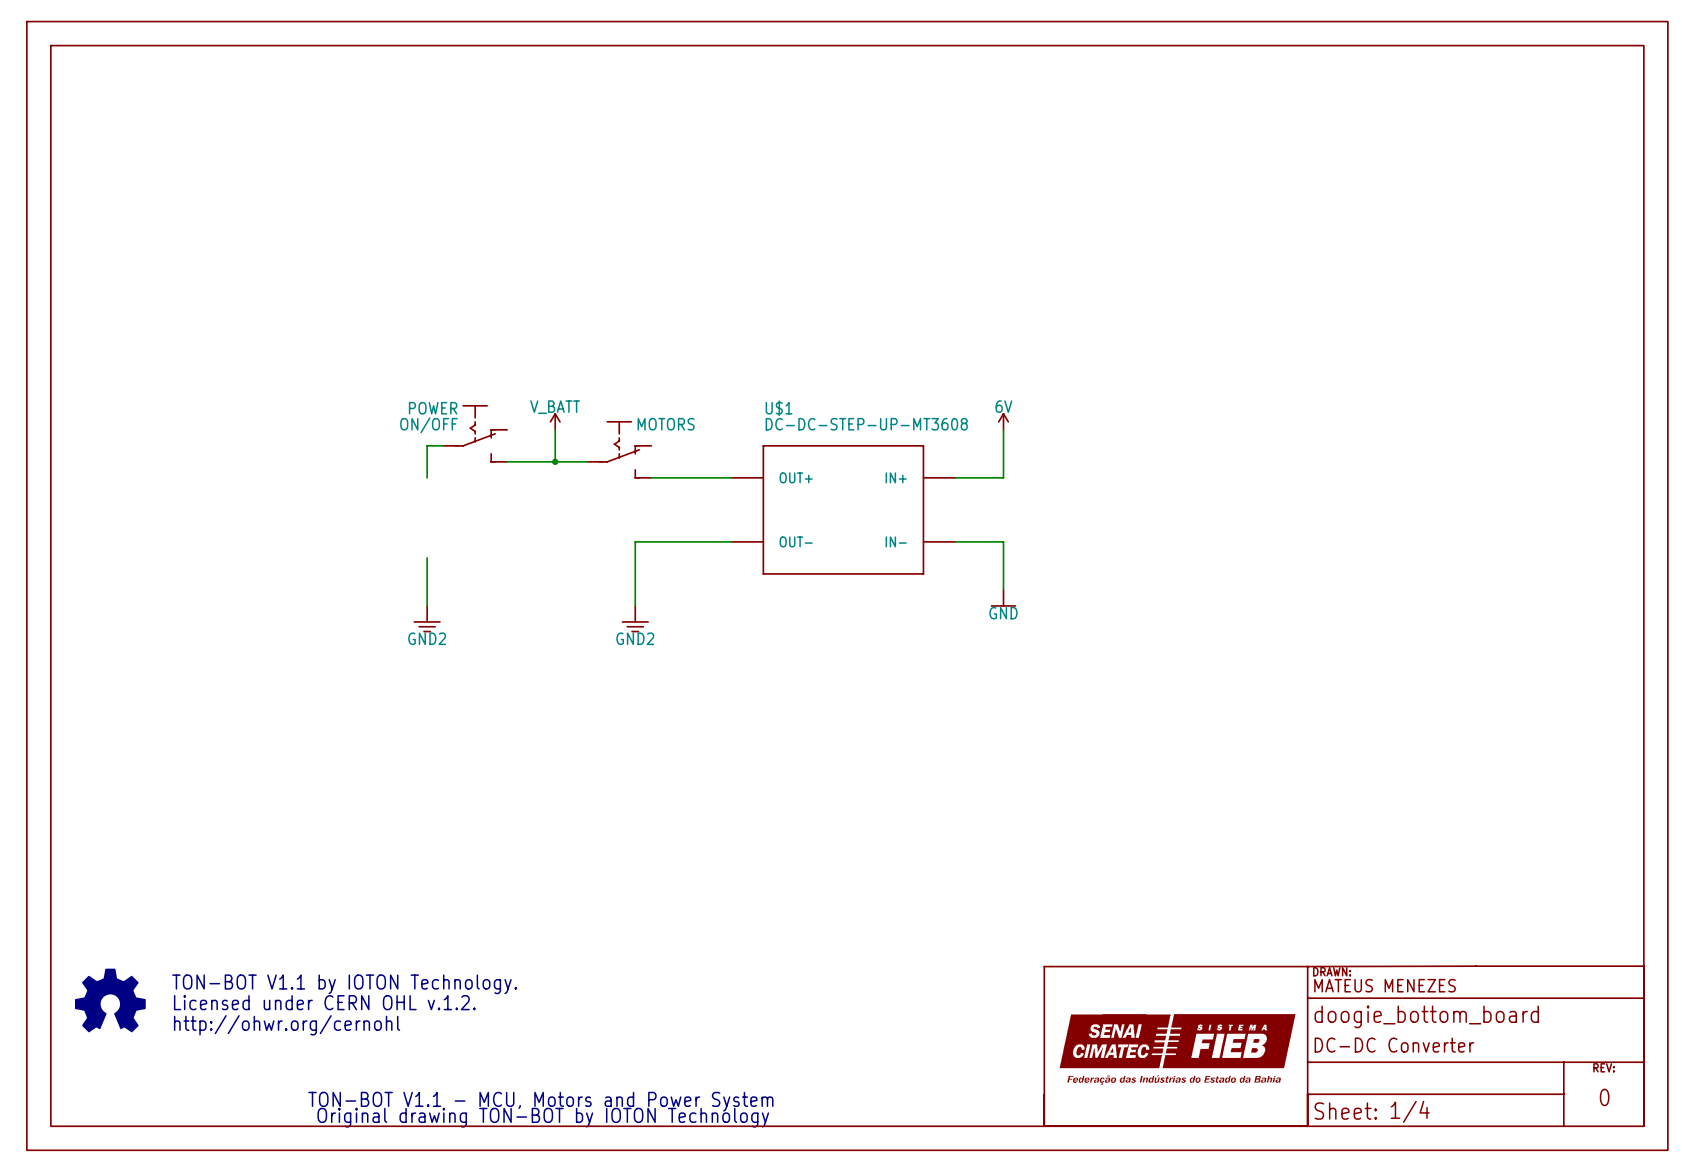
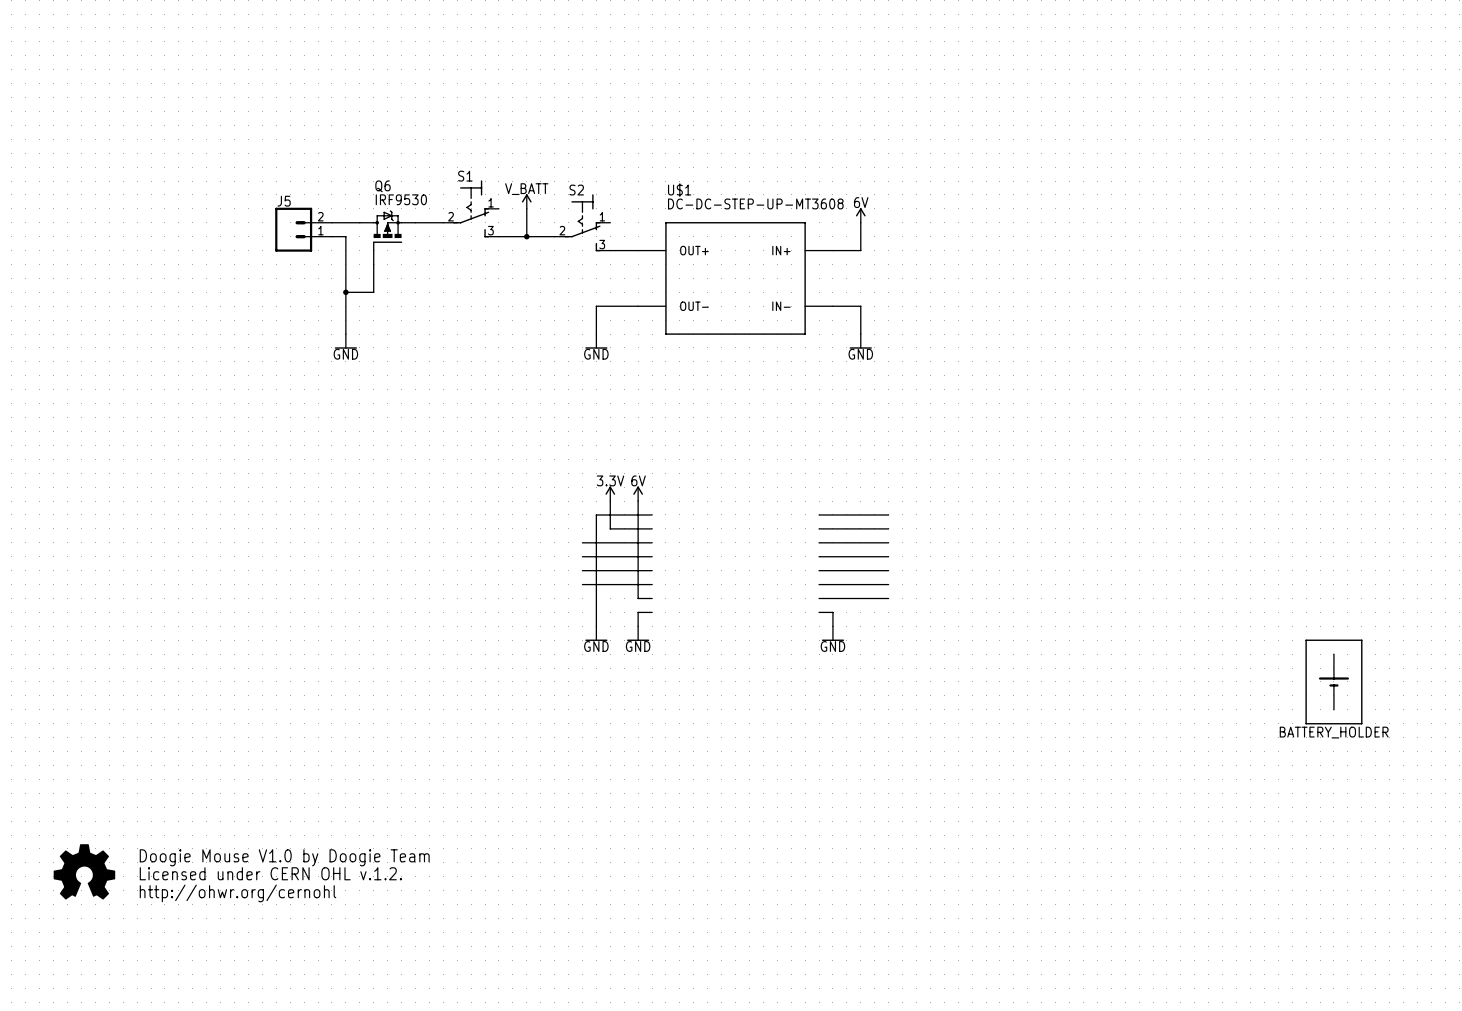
power symbol: none -> V_BATT (526, 201)
S1: none -> (471, 208)
wire: none -> (526, 208) (526, 236)
power symbol: none -> 6V (860, 215)
wire: none -> (331, 222) (359, 222)
wire: none -> (415, 222) (443, 222)
S2: none -> (582, 222)
wire: none -> (860, 222) (860, 250) (832, 250)
J5: none -> (303, 229)
wire: none -> (331, 236) (345, 236) (345, 334)
wire: none -> (498, 236) (554, 236)
junction: none -> (526, 236)
Q6: none -> IRF9530 (387, 237)
wire: none -> (610, 250) (638, 250)
wire: none -> (373, 264) (373, 292) (345, 292)
junction: none -> (345, 292)
wire: none -> (638, 306) (596, 306) (596, 334)
wire: none -> (832, 306) (860, 306) (860, 334)
power symbol: none -> GND (345, 341)
power symbol: none -> GND (596, 341)
power symbol: none -> GND (860, 341)
power symbol: V_BATT (555, 421) -> none
power symbol: 6V (1003, 421) -> none
wire: (555, 429) (555, 461) -> none
wire: (1003, 429) (1003, 477) (955, 477) -> none
POWER: ON/OFF (475, 433) -> none
wire: (443, 445) (427, 445) (427, 477) -> none
MOTORS: (619, 449) -> none
wire: (507, 461) (587, 461) -> none
junction: (555, 461) -> none
wire: (651, 477) (731, 477) -> (582, 542) (652, 542)
U$1 position: (843, 509) -> (735, 278)
wire: (731, 541) (635, 541) (635, 605) -> none
wire: (955, 541) (1003, 541) (1003, 589) -> none
wire: (427, 557) (427, 605) -> none
power symbol: none -> 3.3V (610, 493)
power symbol: none -> 6V (638, 493)
wire: none -> (610, 501) (610, 528) (652, 528)
wire: none -> (638, 501) (638, 598) (652, 598)
part: (847, 585) -> none
wire: none -> (652, 514) (596, 514) (596, 626)
wire: none -> (819, 514) (888, 514)
power symbol: GND (1003, 598) -> none
wire: none -> (819, 528) (888, 528)
power symbol: GND2 (427, 619) -> none
power symbol: GND2 (635, 619) -> none
wire: none -> (819, 542) (888, 542)
wire: none -> (582, 556) (652, 556)
wire: none -> (819, 556) (888, 556)
wire: none -> (582, 570) (652, 570)
wire: none -> (819, 570) (888, 570)
wire: none -> (582, 584) (652, 584)
wire: none -> (819, 584) (888, 584)
wire: none -> (819, 598) (888, 598)
wire: none -> (652, 612) (638, 612) (638, 626)
wire: none -> (819, 612) (832, 612) (832, 626)
power symbol: none -> GND (596, 633)
power symbol: none -> GND (638, 633)
power symbol: none -> GND (832, 633)
BATTERY_HOLDER: none -> (1333, 681)
text: TON-BOT V1.1 by IOTON Technology. (344, 984) -> Doogie Mouse V1.0 by Doogie Team (284, 857)
text: TON-BOT V1.1 - MCU, Motors and Power System (540, 1101) -> none
text: Original drawing TON-BOT by IOTON Technology (543, 1117) -> none

